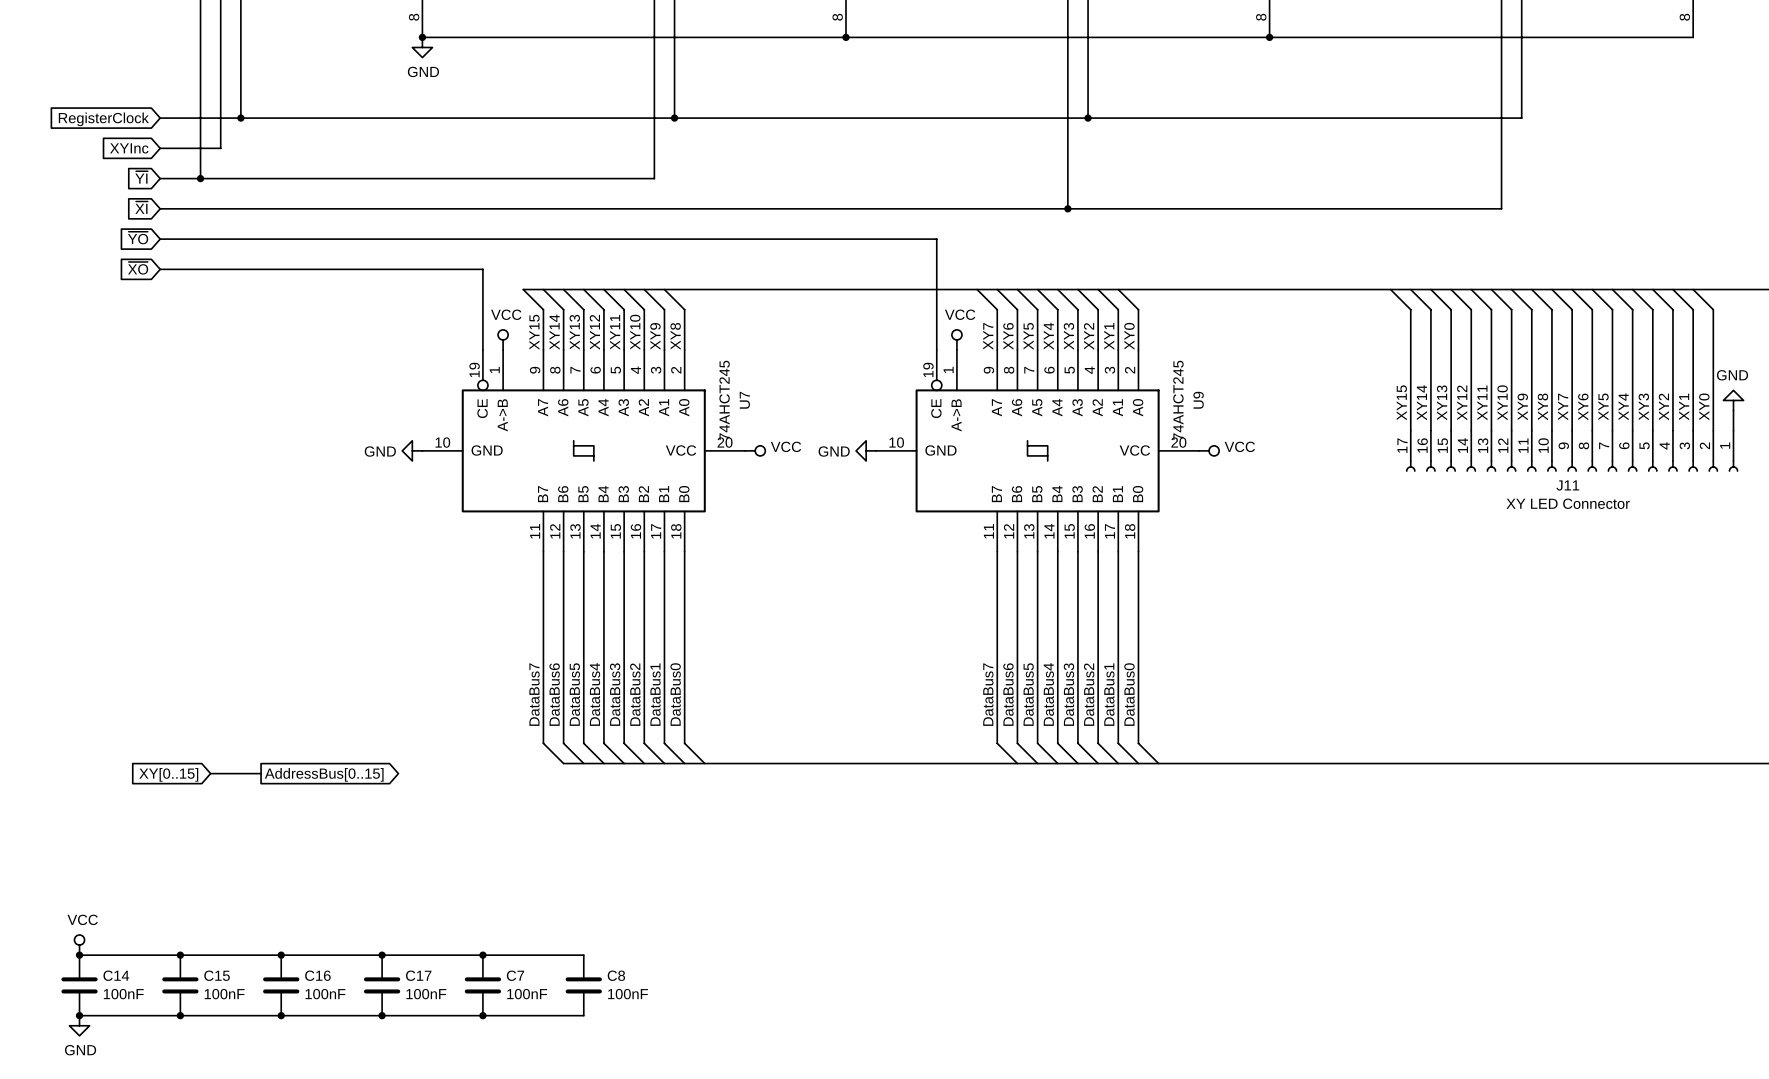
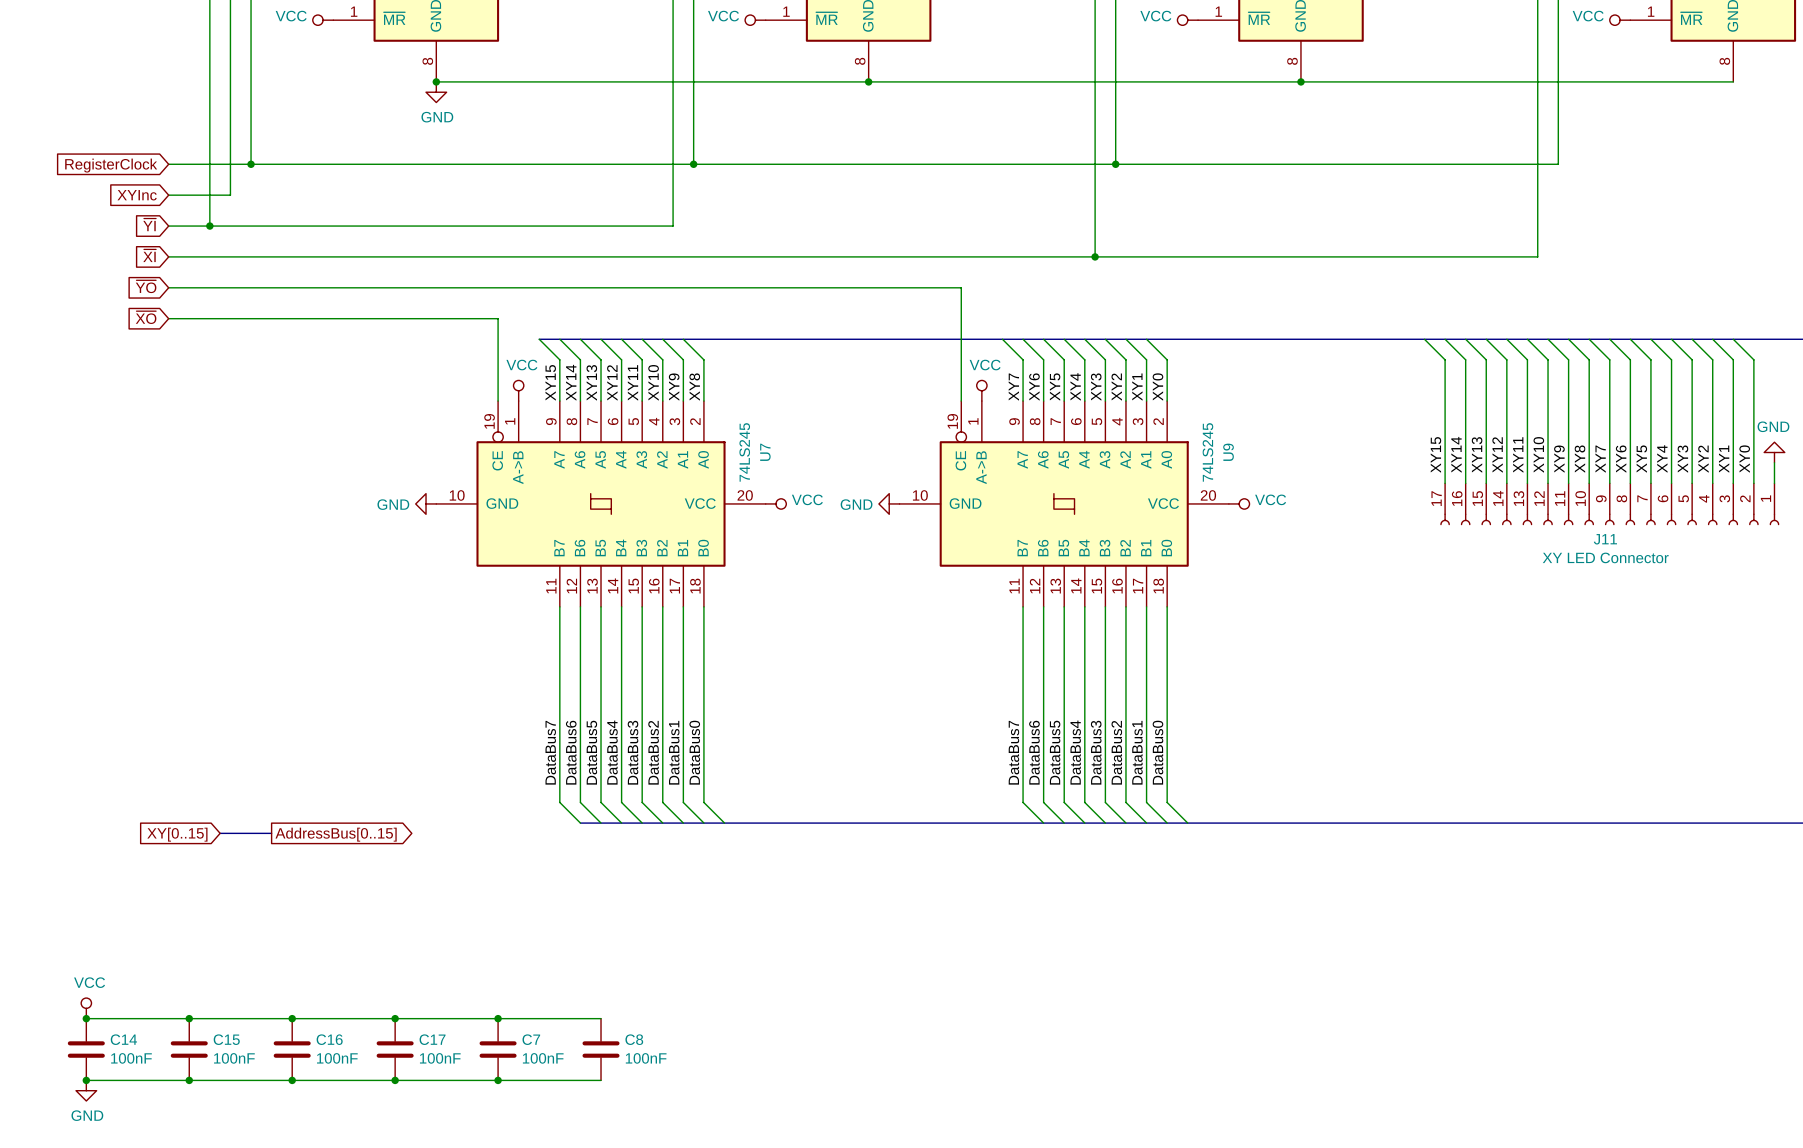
U7 value: 74AHCT245 (724, 400) -> 74LS245 (744, 452)
U9 value: 74AHCT245 (1178, 400) -> 74LS245 (1207, 452)

